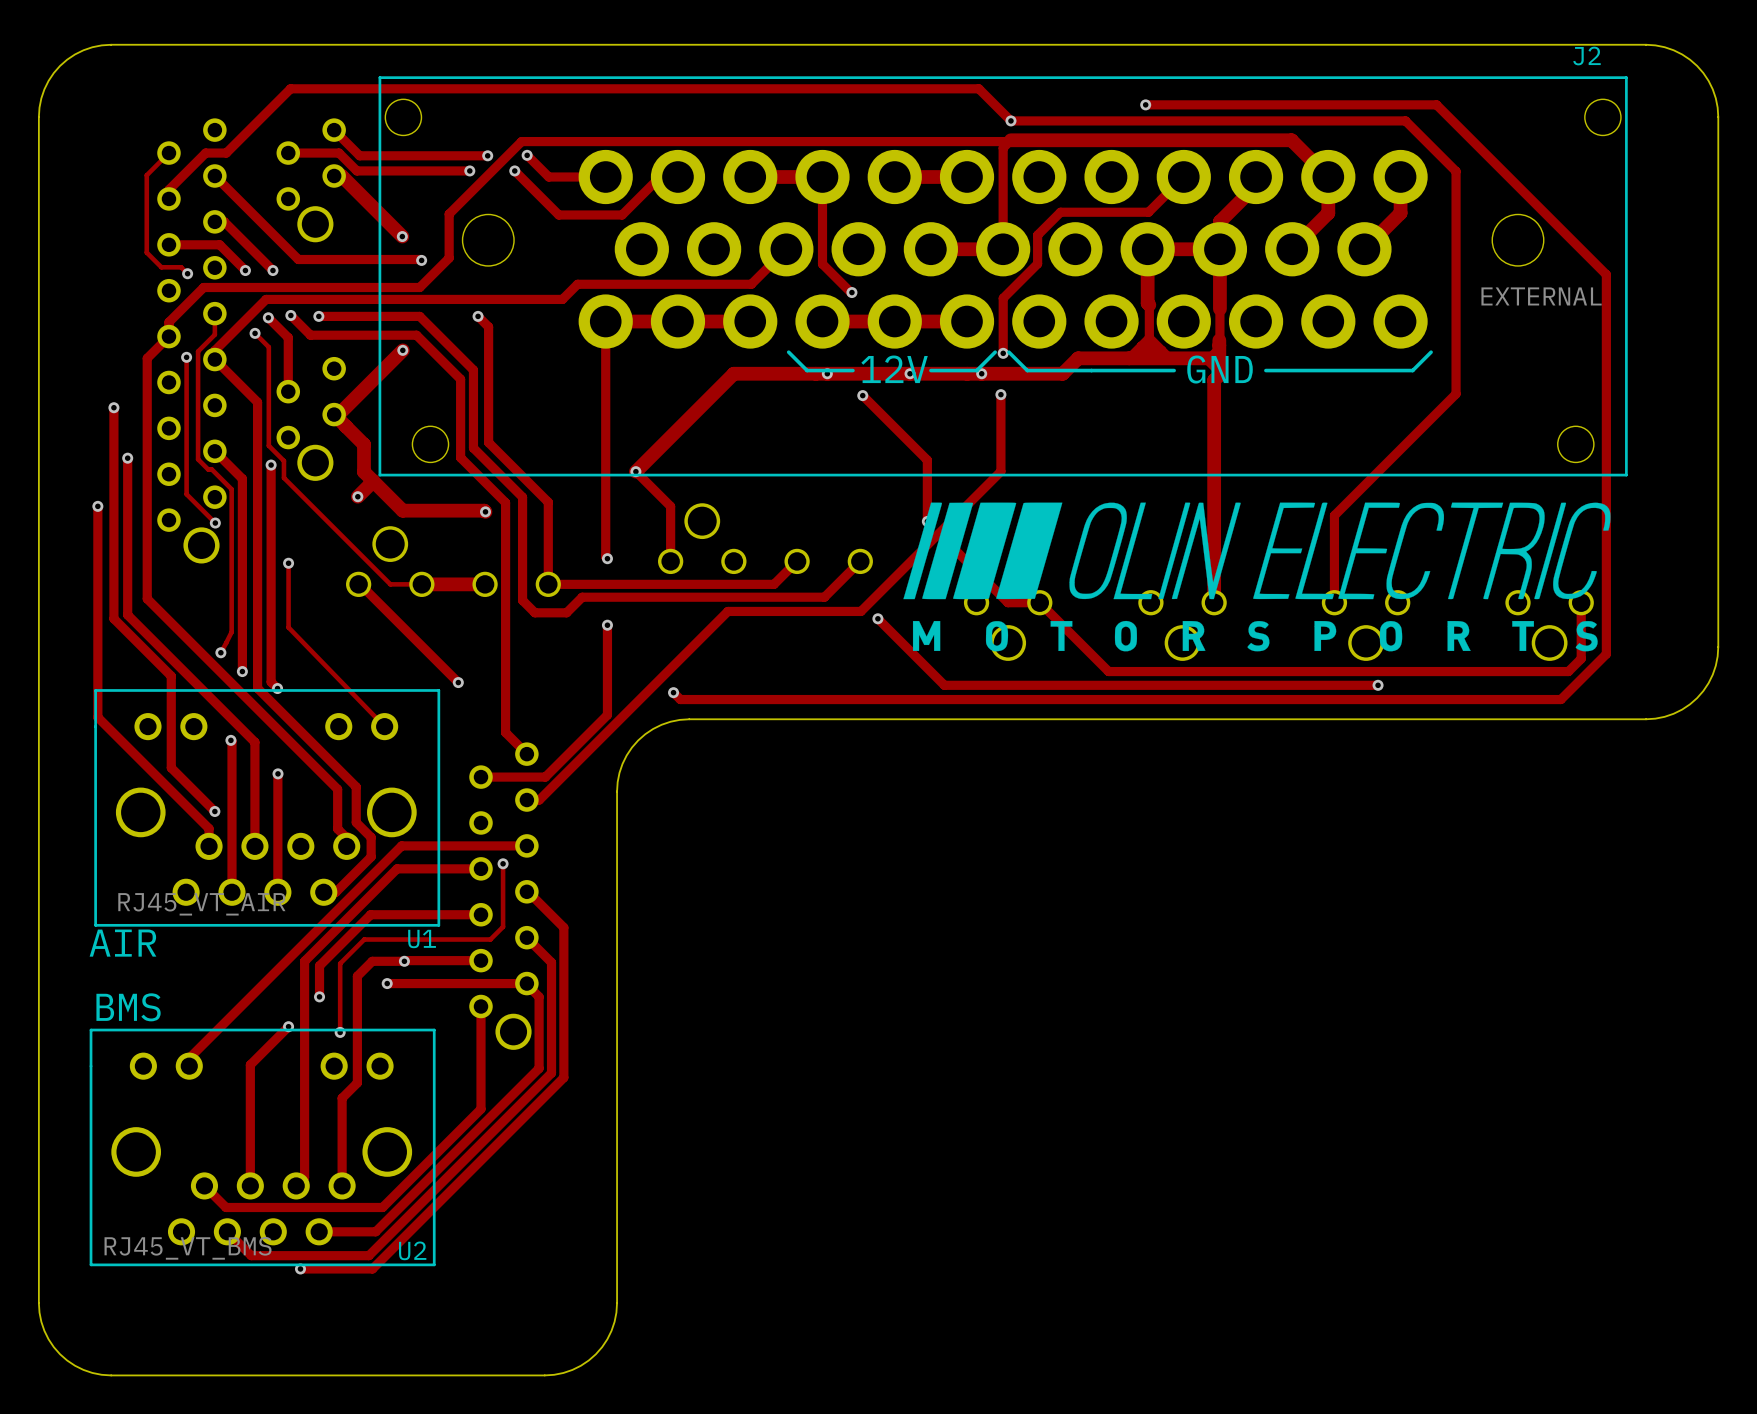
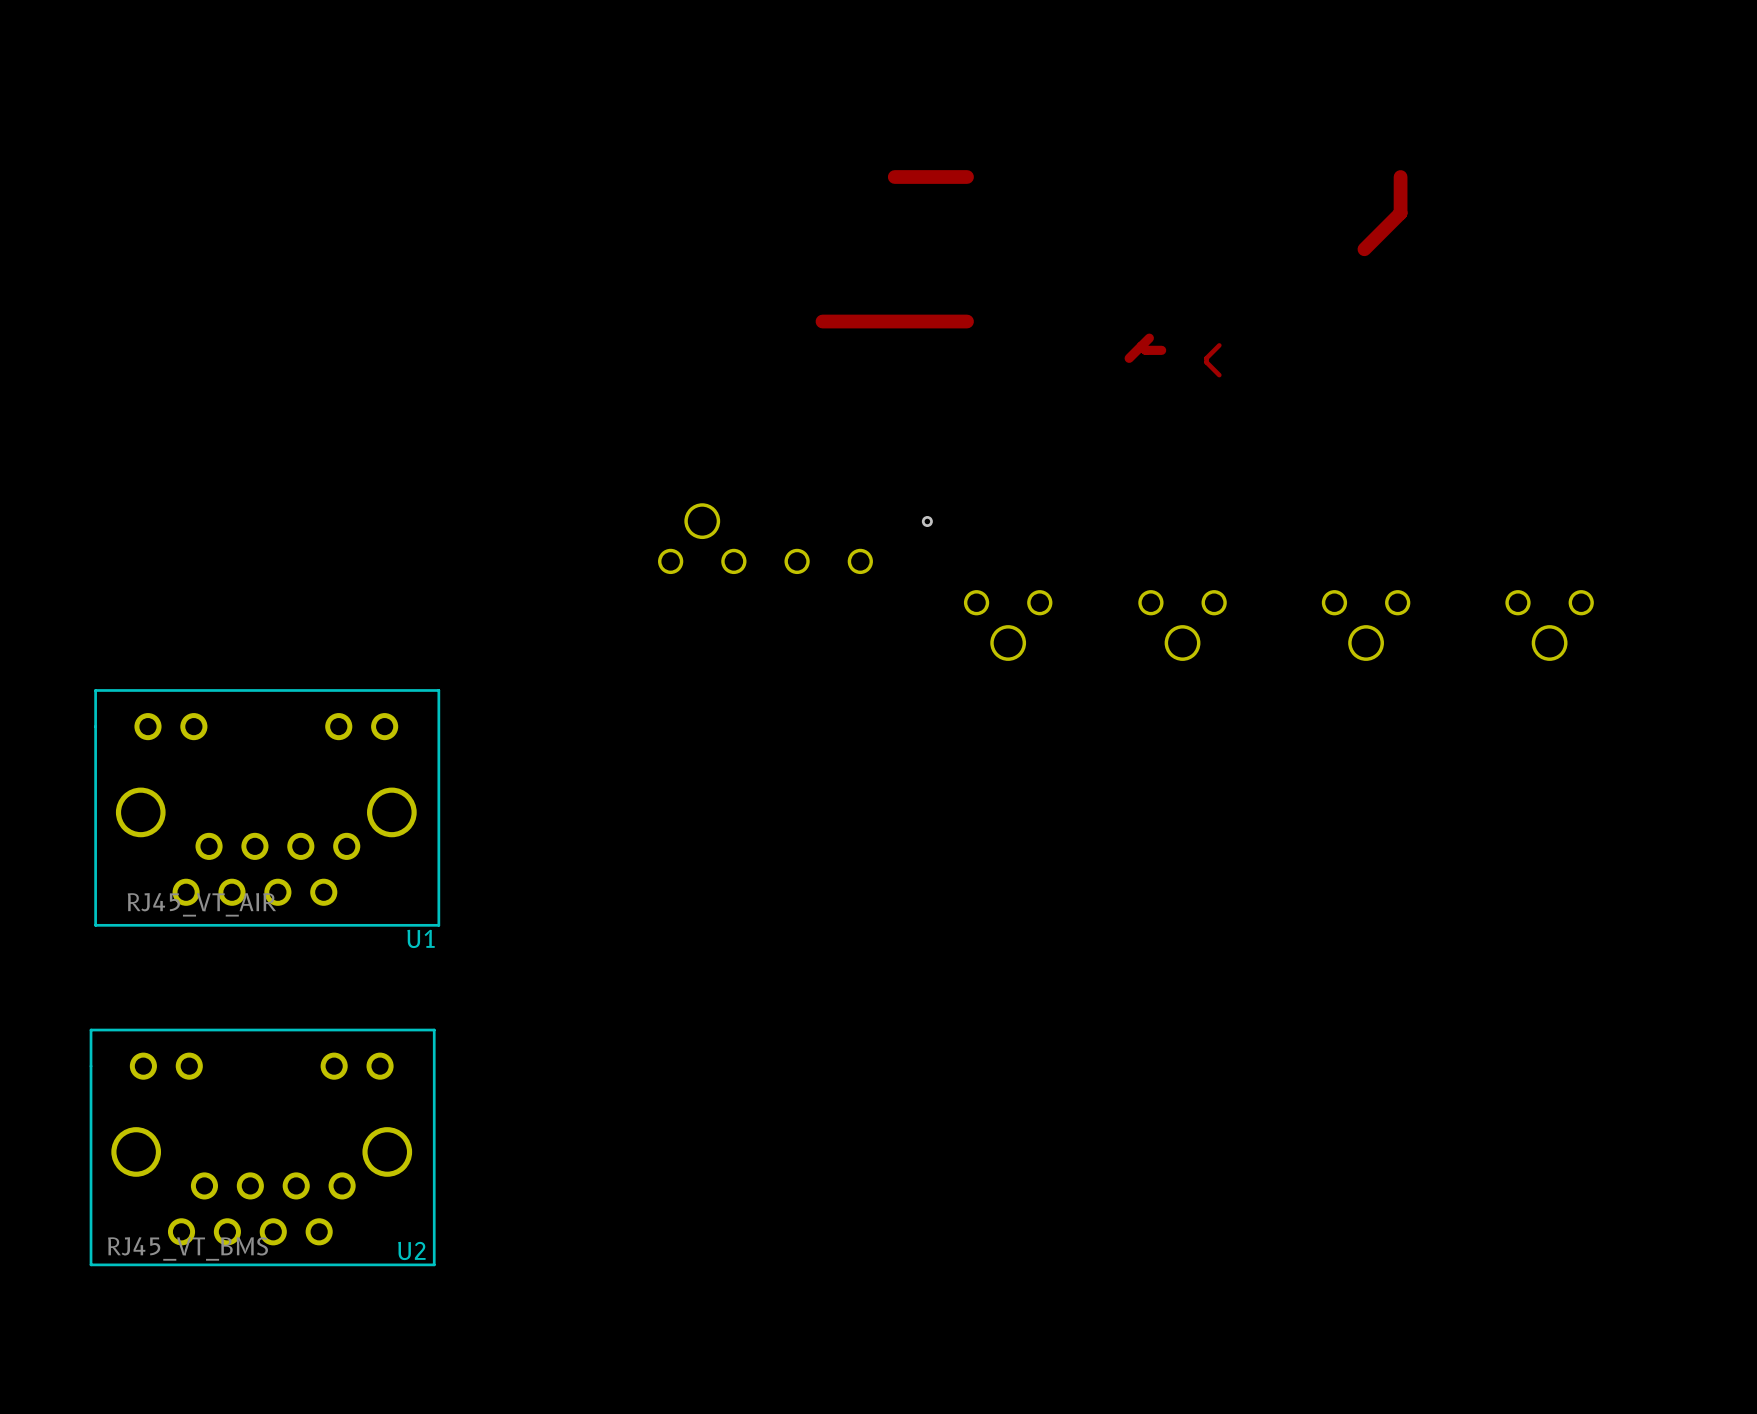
board edge: (111, 44) (1646, 44) (1673, 50) (1690, 59) (1703, 73) (1712, 89) (1718, 117) (1718, 647) (1712, 674) (1703, 691) (1690, 704) (1673, 713) (1646, 719) (689, 719) (661, 724) (645, 734) (631, 747) (622, 763) (617, 782) (617, 1303) (611, 1330) (595, 1354) (572, 1369) (544, 1375) (111, 1375) (83, 1369) (67, 1360) (53, 1347) (44, 1330) (38, 1303) (38, 117) (44, 89) (60, 65) (83, 50) (111, 44) -> none
track: (1145, 104) (1436, 104) (1606, 274) (1606, 654) (1560, 699) (680, 699) (673, 692) -> none
via: (1145, 104) -> none
via: (1010, 120) -> none
track: (334, 130) (359, 155) (487, 155) -> none
track: (1009, 141) (521, 141) (449, 214) (449, 258) (419, 287) (203, 287) (168, 322) (168, 336) (147, 358) (147, 598) (337, 789) (337, 828) (346, 837) (346, 846) (346, 838) -> none
track: (168, 153) (146, 175) (146, 252) (161, 267) (181, 267) (187, 273) -> none
track: (288, 153) (339, 153) (356, 170) (469, 170) -> none
via: (487, 155) -> none
track: (527, 155) (548, 177) (605, 177) -> none
via: (527, 155) -> none
via: (469, 170) -> none
track: (514, 170) (558, 214) (622, 214) (660, 177) (677, 177) -> none
via: (514, 170) -> none
track: (214, 175) (298, 259) (421, 260) -> none
track: (334, 175) (341, 175) (402, 236) -> none
track: (750, 177) (822, 177) (822, 264) (851, 292) -> none
track: (1165, 177) (1183, 177) (1148, 212) (1060, 212) (1037, 235) (1037, 263) (1003, 298) (1003, 353) -> none
track: (1256, 177) (1256, 185) (1219, 221) (1219, 375) (1214, 380) (1214, 602) -> none
part: (311, 180) -> none
track: (168, 198) (168, 189) (205, 153) (226, 153) (290, 88) (978, 88) (1010, 120) (1405, 120) (1456, 171) (1456, 393) (1334, 515) (1334, 602) -> none
track: (214, 221) (224, 221) (272, 270) -> none
via: (402, 236) -> none
track: (168, 244) (219, 244) (245, 270) -> none
track: (786, 249) (751, 284) (577, 284) (562, 299) (266, 299) (214, 350) (214, 359) (257, 402) (257, 688) (356, 786) (356, 822) (371, 837) (371, 856) (335, 892) (323, 892) -> none
track: (930, 249) (1003, 249) (1003, 148) (1010, 140) (1291, 140) (1328, 177) (1328, 213) (1292, 249) -> none
track: (1219, 249) (1147, 249) (1150, 350) -> none
via: (421, 260) -> none
via: (245, 270) -> none
via: (272, 270) -> none
via: (187, 273) -> none
J2: EXTERNAL (1003, 276) -> none
via: (851, 292) -> none
track: (214, 313) (214, 334) (198, 351) (198, 459) (208, 469) (211, 469) (231, 489) (231, 632) (220, 652) (222, 652) -> none
track: (290, 315) (310, 335) (416, 335) (460, 379) (460, 457) (505, 502) (505, 732) (526, 753) -> none
via: (290, 315) -> none
track: (318, 316) (419, 316) (473, 370) (473, 448) (522, 497) (522, 600) (534, 612) (566, 612) (582, 597) (824, 597) (860, 561) (857, 561) -> none
via: (318, 316) -> none
track: (478, 316) (488, 326) (488, 442) (548, 502) (548, 584) (774, 584) (796, 561) -> none
via: (478, 316) -> none
track: (268, 317) (288, 337) (288, 391) -> none
via: (268, 317) -> none
track: (750, 321) (605, 321) (605, 556) (607, 558) -> none
track: (255, 333) (268, 347) (268, 445) (283, 460) (283, 477) (390, 584) (485, 584) -> none
via: (255, 333) -> none
track: (1149, 338) (1169, 358) (1219, 358) (1078, 358) (1062, 373) (733, 373) (635, 471) (670, 506) (670, 561) -> none
part: (191, 340) -> none
track: (402, 350) (338, 414) -> none
via: (402, 350) -> none
line: (788, 352) (807, 370) (852, 370) -> none
line: (995, 352) (976, 370) (930, 370) -> none
line: (1008, 352) (1027, 370) (1174, 370) -> none
line: (1431, 352) (1412, 370) (1265, 370) -> none
via: (1003, 353) -> none
track: (186, 357) (186, 494) (215, 523) -> none
via: (186, 357) -> none
text: 12V (894, 369) -> none
text: GND (1220, 369) -> none
via: (827, 373) -> none
via: (910, 373) -> none
via: (981, 373) -> none
track: (1000, 394) (1000, 471) (860, 611) (727, 611) (539, 800) (526, 800) (526, 797) -> none
via: (1000, 394) -> none
track: (862, 395) (927, 460) (927, 521) -> none
via: (862, 395) -> none
track: (113, 407) (113, 618) (171, 676) (171, 767) (214, 811) -> none
via: (113, 407) -> none
track: (338, 414) (334, 414) (363, 444) (363, 471) (402, 510) (485, 511) -> none
part: (311, 418) -> none
track: (214, 451) (242, 478) (242, 671) -> none
track: (127, 458) (127, 615) (254, 742) (254, 846) -> none
via: (127, 458) -> none
track: (271, 465) (271, 682) (277, 688) -> none
via: (271, 465) -> none
via: (635, 471) -> none
track: (373, 481) (357, 496) -> none
via: (357, 496) -> none
drawing: [903, 502, 1611, 652] -> none
track: (97, 506) (97, 717) (209, 828) (209, 846) -> none
via: (97, 506) -> none
via: (485, 511) -> none
via: (215, 523) -> none
track: (950, 545) (1007, 602) (1039, 602) (1108, 671) (1568, 671) (1581, 658) (1581, 602) -> none
via: (607, 558) -> none
part: (453, 561) -> none
track: (288, 563) (288, 627) (384, 726) -> none
via: (288, 563) -> none
track: (358, 584) (458, 682) -> none
track: (877, 618) (944, 685) (1378, 685) -> none
via: (877, 618) -> none
track: (607, 625) (607, 715) (545, 777) (481, 777) -> none
via: (607, 625) -> none
via: (220, 652) -> none
via: (242, 671) -> none
via: (458, 682) -> none
via: (1378, 685) -> none
via: (277, 688) -> none
via: (673, 692) -> none
track: (230, 740) (231, 892) -> none
via: (230, 740) -> none
via: (278, 773) -> none
track: (277, 774) (277, 892) -> none
via: (214, 811) -> none
track: (526, 845) (401, 845) (189, 1058) (189, 1066) (199, 1066) -> none
track: (503, 863) (503, 926) (490, 939) (364, 939) (340, 963) (340, 1032) -> none
via: (503, 863) -> none
track: (481, 868) (397, 868) (304, 961) (304, 1177) (296, 1185) -> none
part: (503, 896) -> none
track: (526, 896) (528, 891) (563, 927) (563, 1077) (372, 1268) (300, 1268) -> none
track: (481, 914) (370, 914) (319, 965) (319, 996) -> none
track: (526, 937) (551, 962) (551, 1073) (368, 1255) (251, 1255) (227, 1231) -> none
text: AIR (122, 943) -> none
track: (481, 960) (372, 961) (357, 976) (357, 1082) (342, 1098) (342, 1185) -> none
via: (404, 961) -> none
track: (387, 983) (526, 983) (539, 996) (539, 1068) (375, 1231) (319, 1231) -> none
via: (387, 983) -> none
via: (319, 996) -> none
track: (481, 1006) (481, 1109) (382, 1207) (226, 1207) (204, 1185) -> none
text: BMS (128, 1007) -> none
track: (288, 1026) (250, 1064) (250, 1185) -> none
via: (288, 1026) -> none
via: (340, 1032) -> none
via: (300, 1268) -> none

